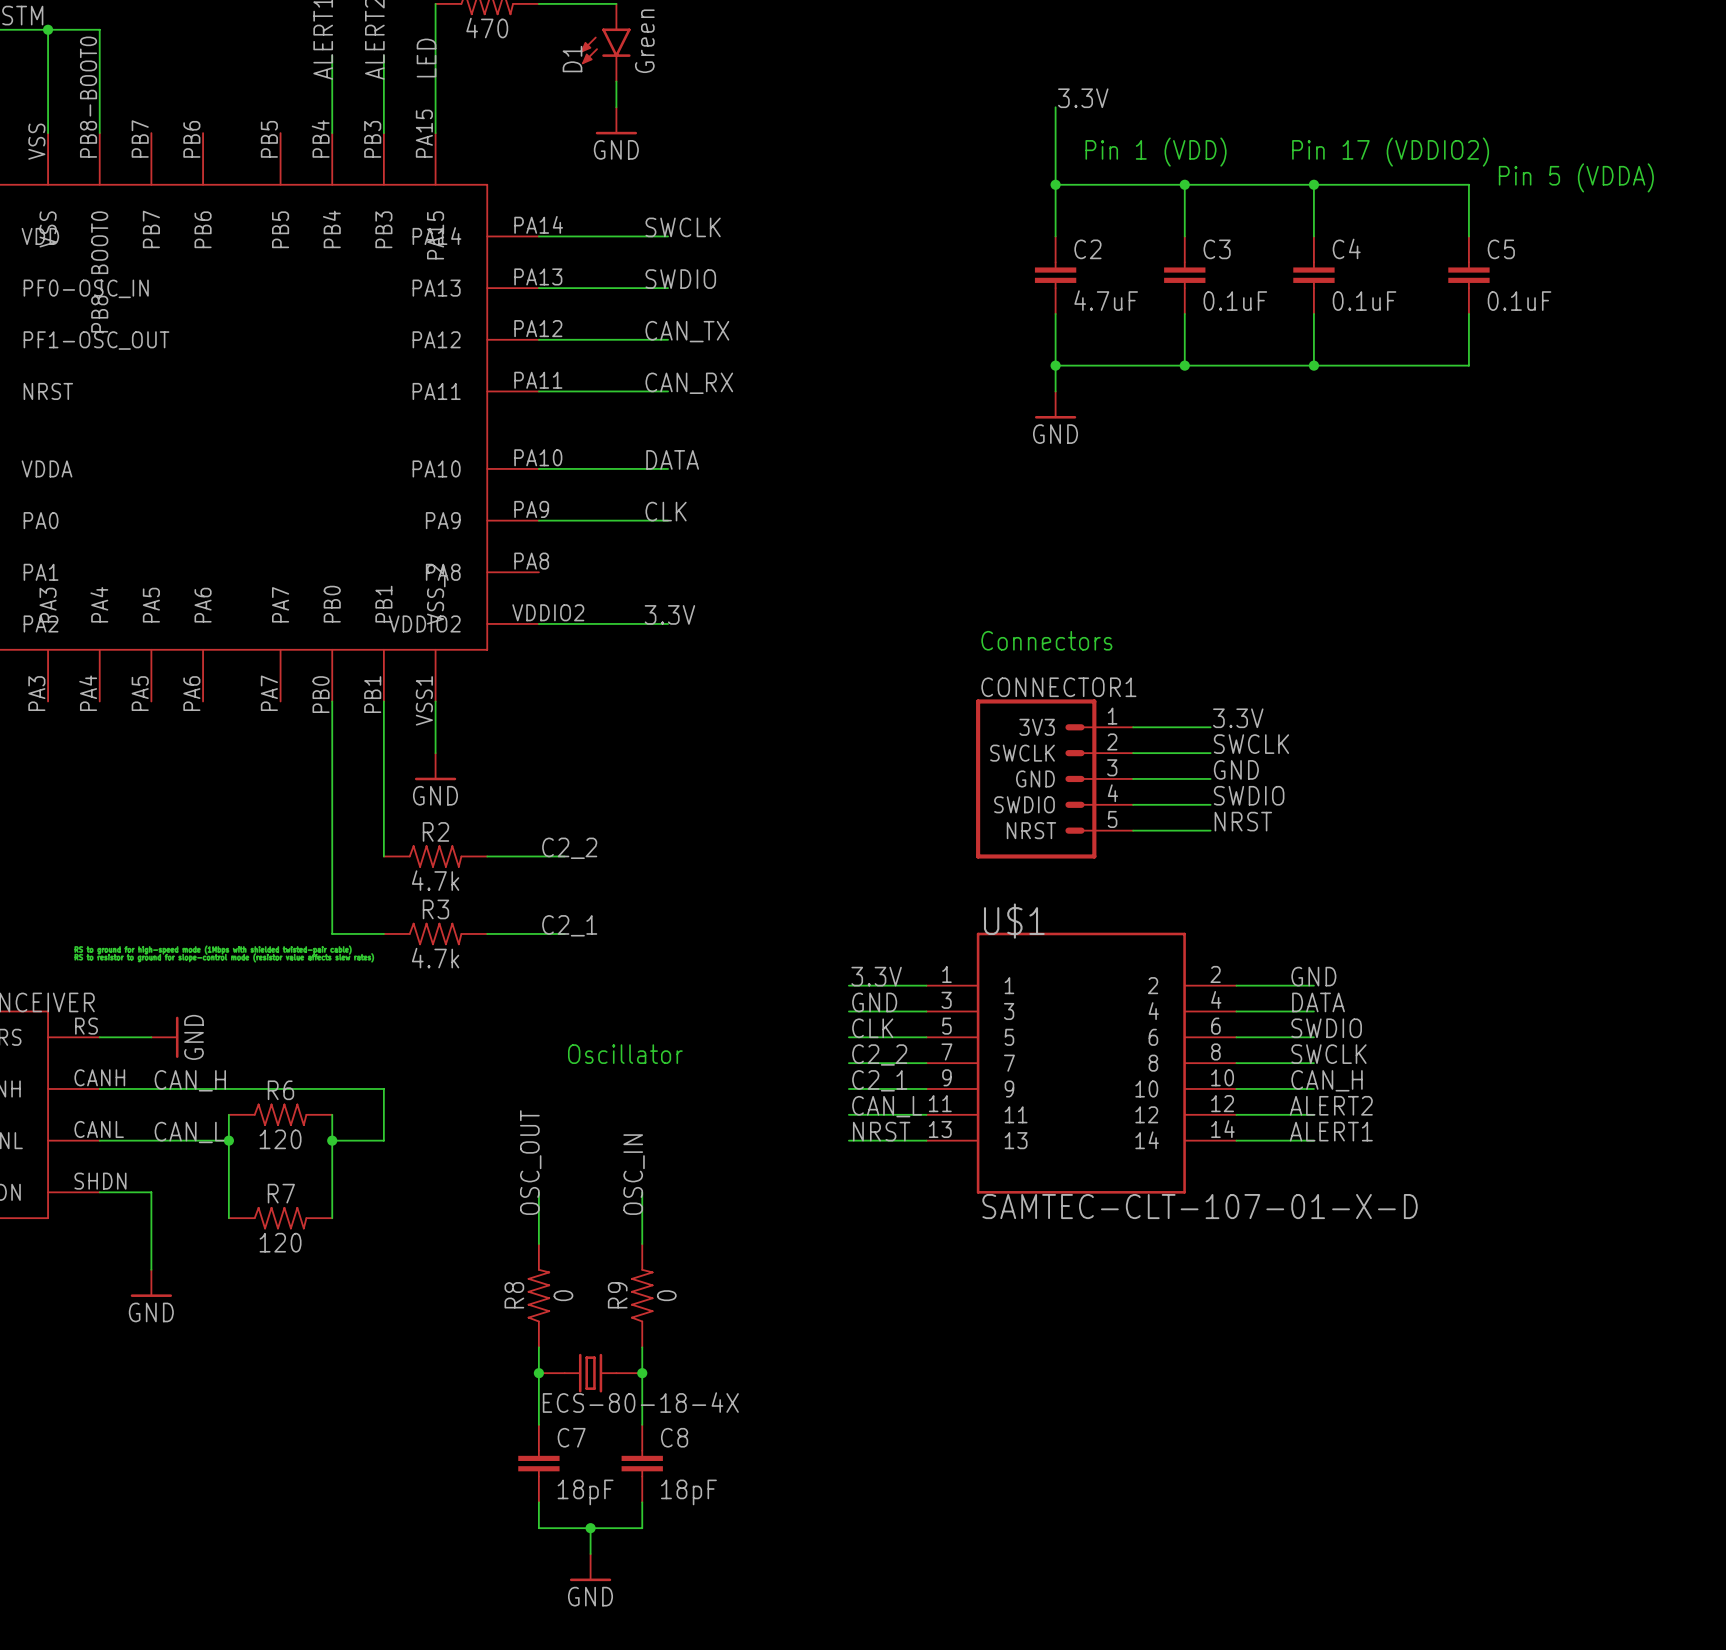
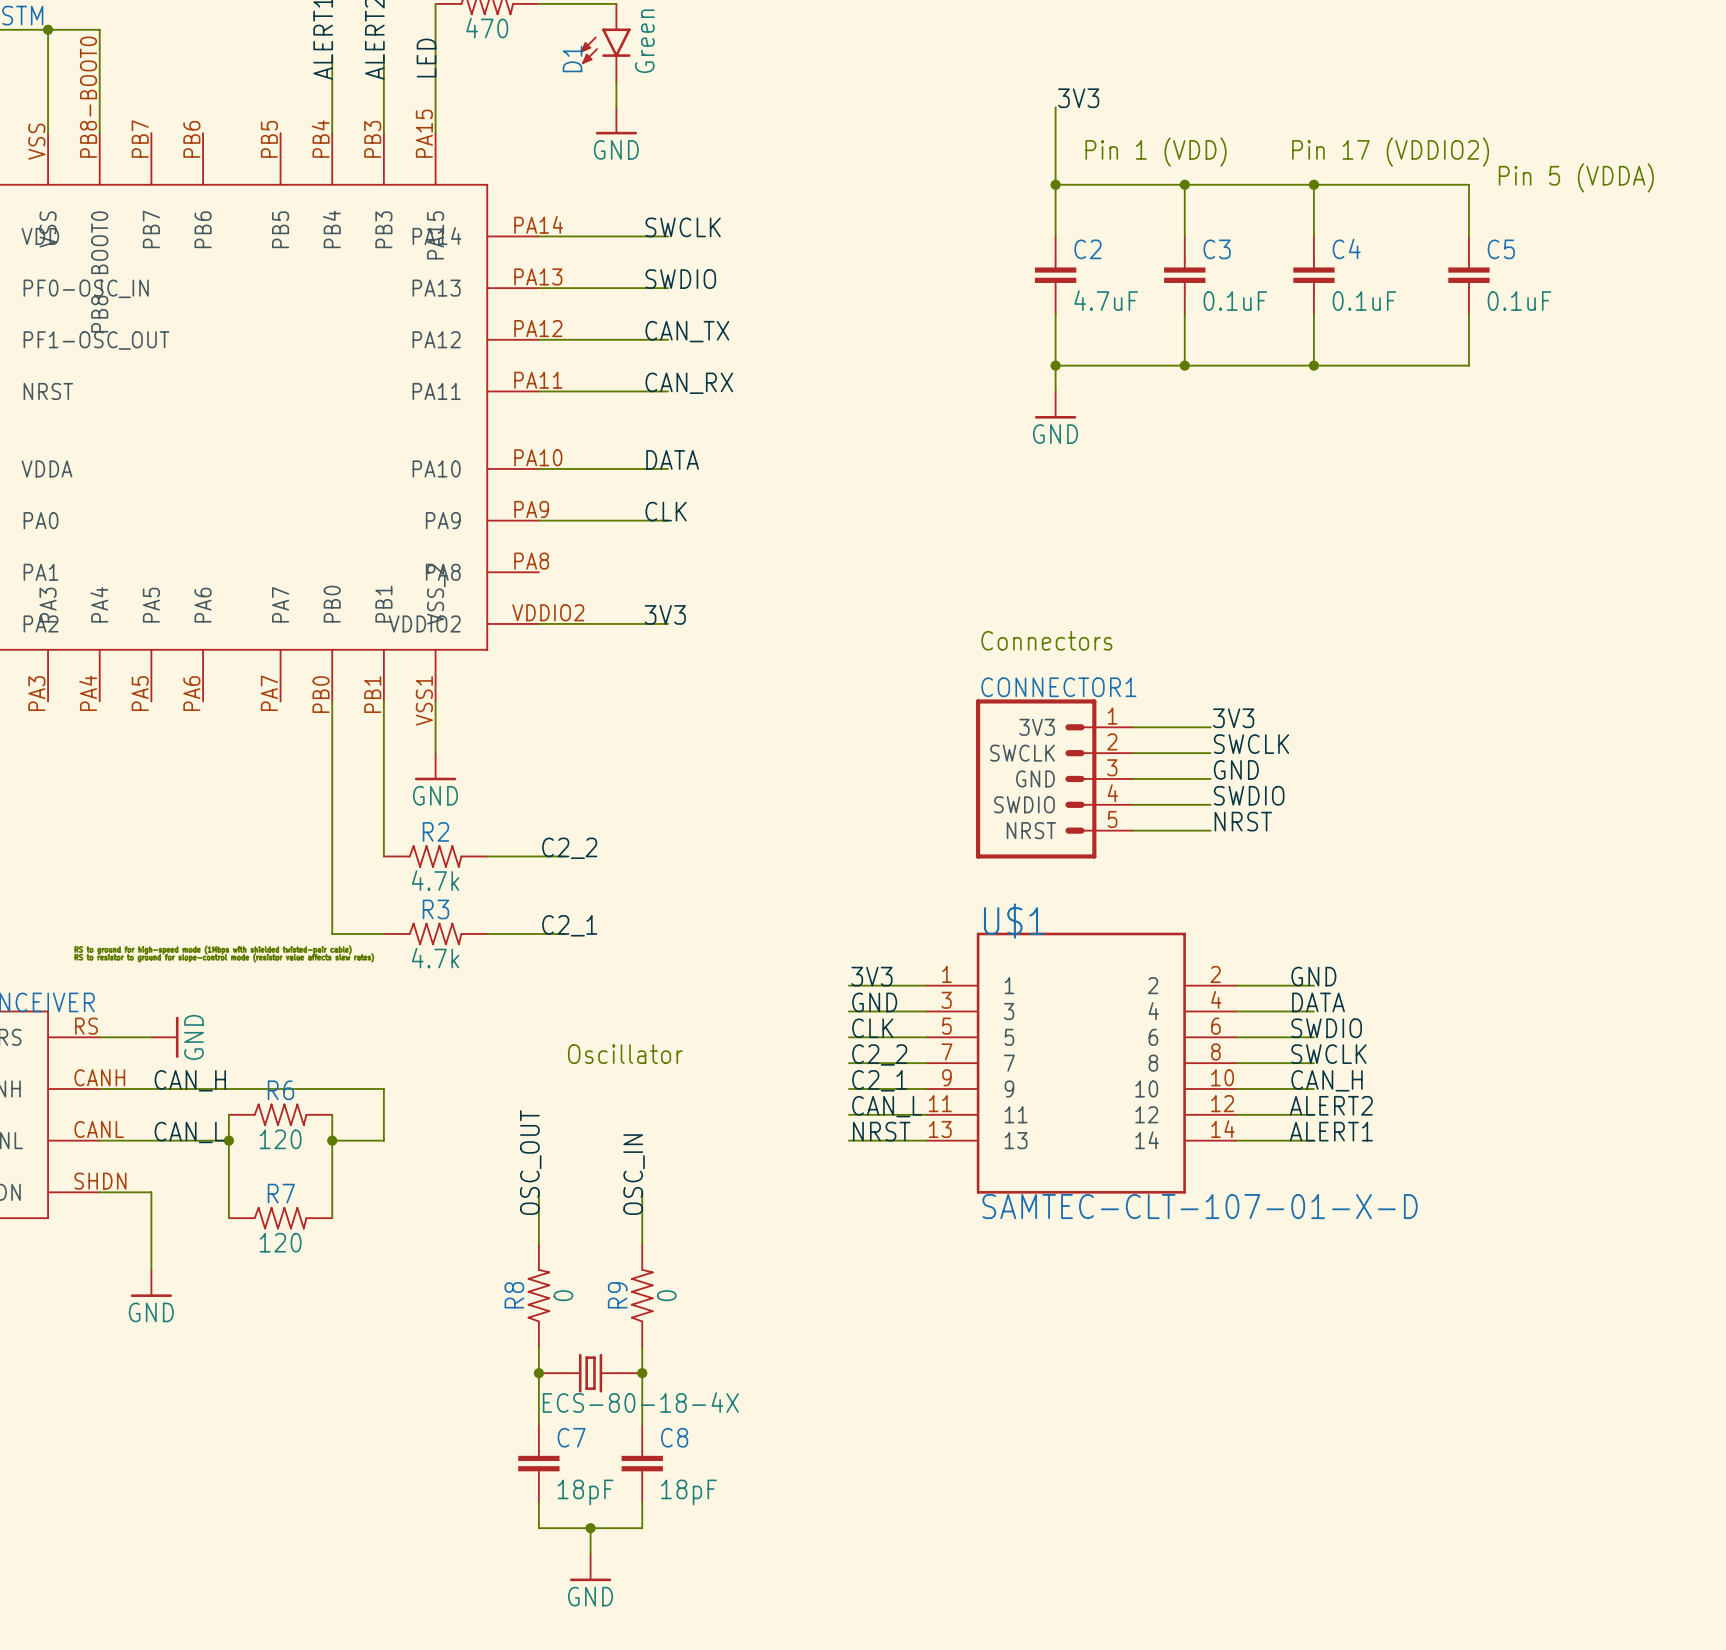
label: 3.3V (1083, 98) -> 3V3 (1078, 98)
label: 3.3V (669, 614) -> 3V3 (665, 614)
label: 3.3V (1238, 718) -> 3V3 (1233, 718)
label: 3.3V (876, 976) -> 3V3 (871, 976)

